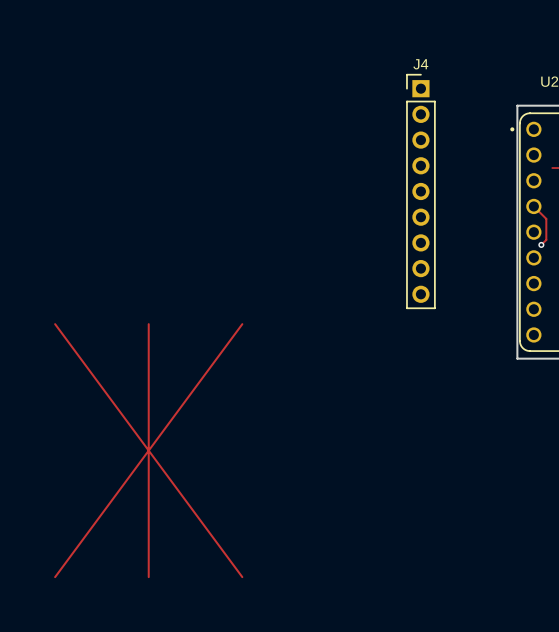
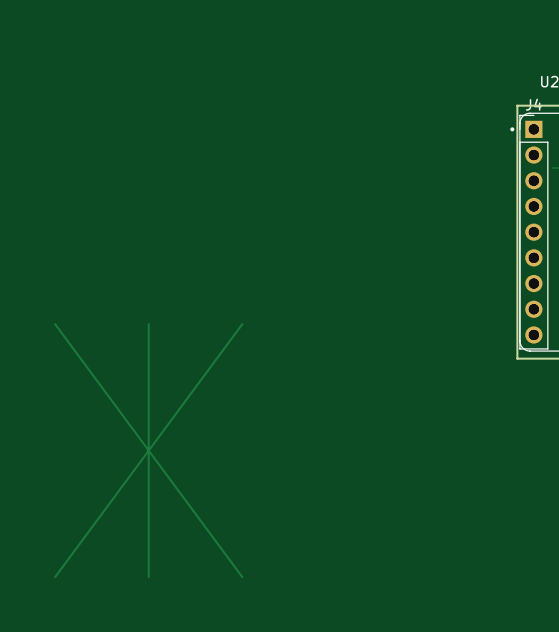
J4 position: (420, 191) -> (533, 232)
track: (533, 206) (546, 218) (546, 239) (541, 244) -> none
via: (541, 244) -> none

